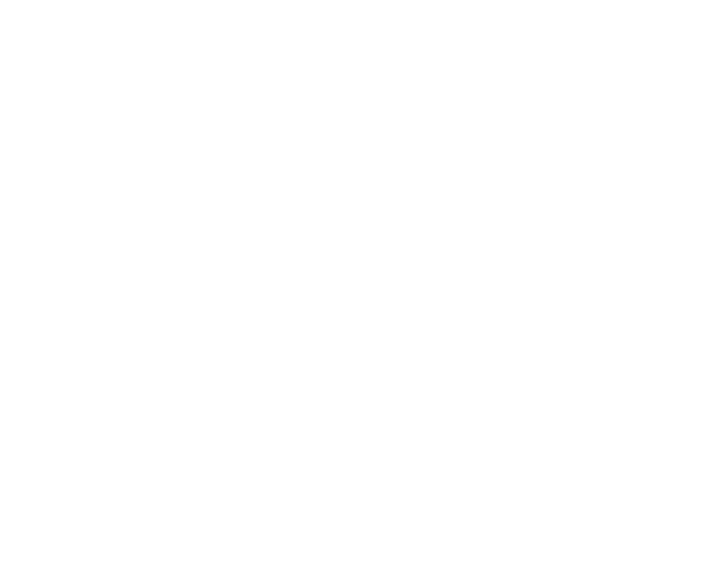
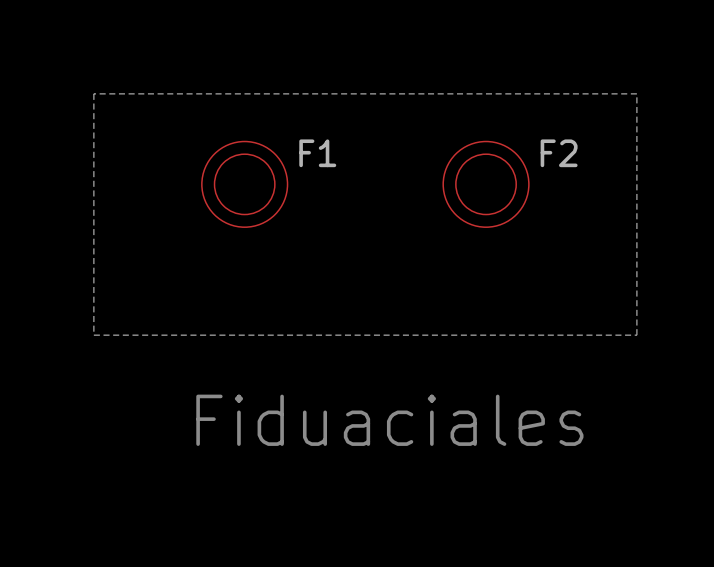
line: none -> (93, 93) (93, 335) (636, 335) (636, 93) (93, 93)
F1: none -> (244, 184)
F2: none -> (486, 184)
text: none -> Fiduaciales (389, 420)

